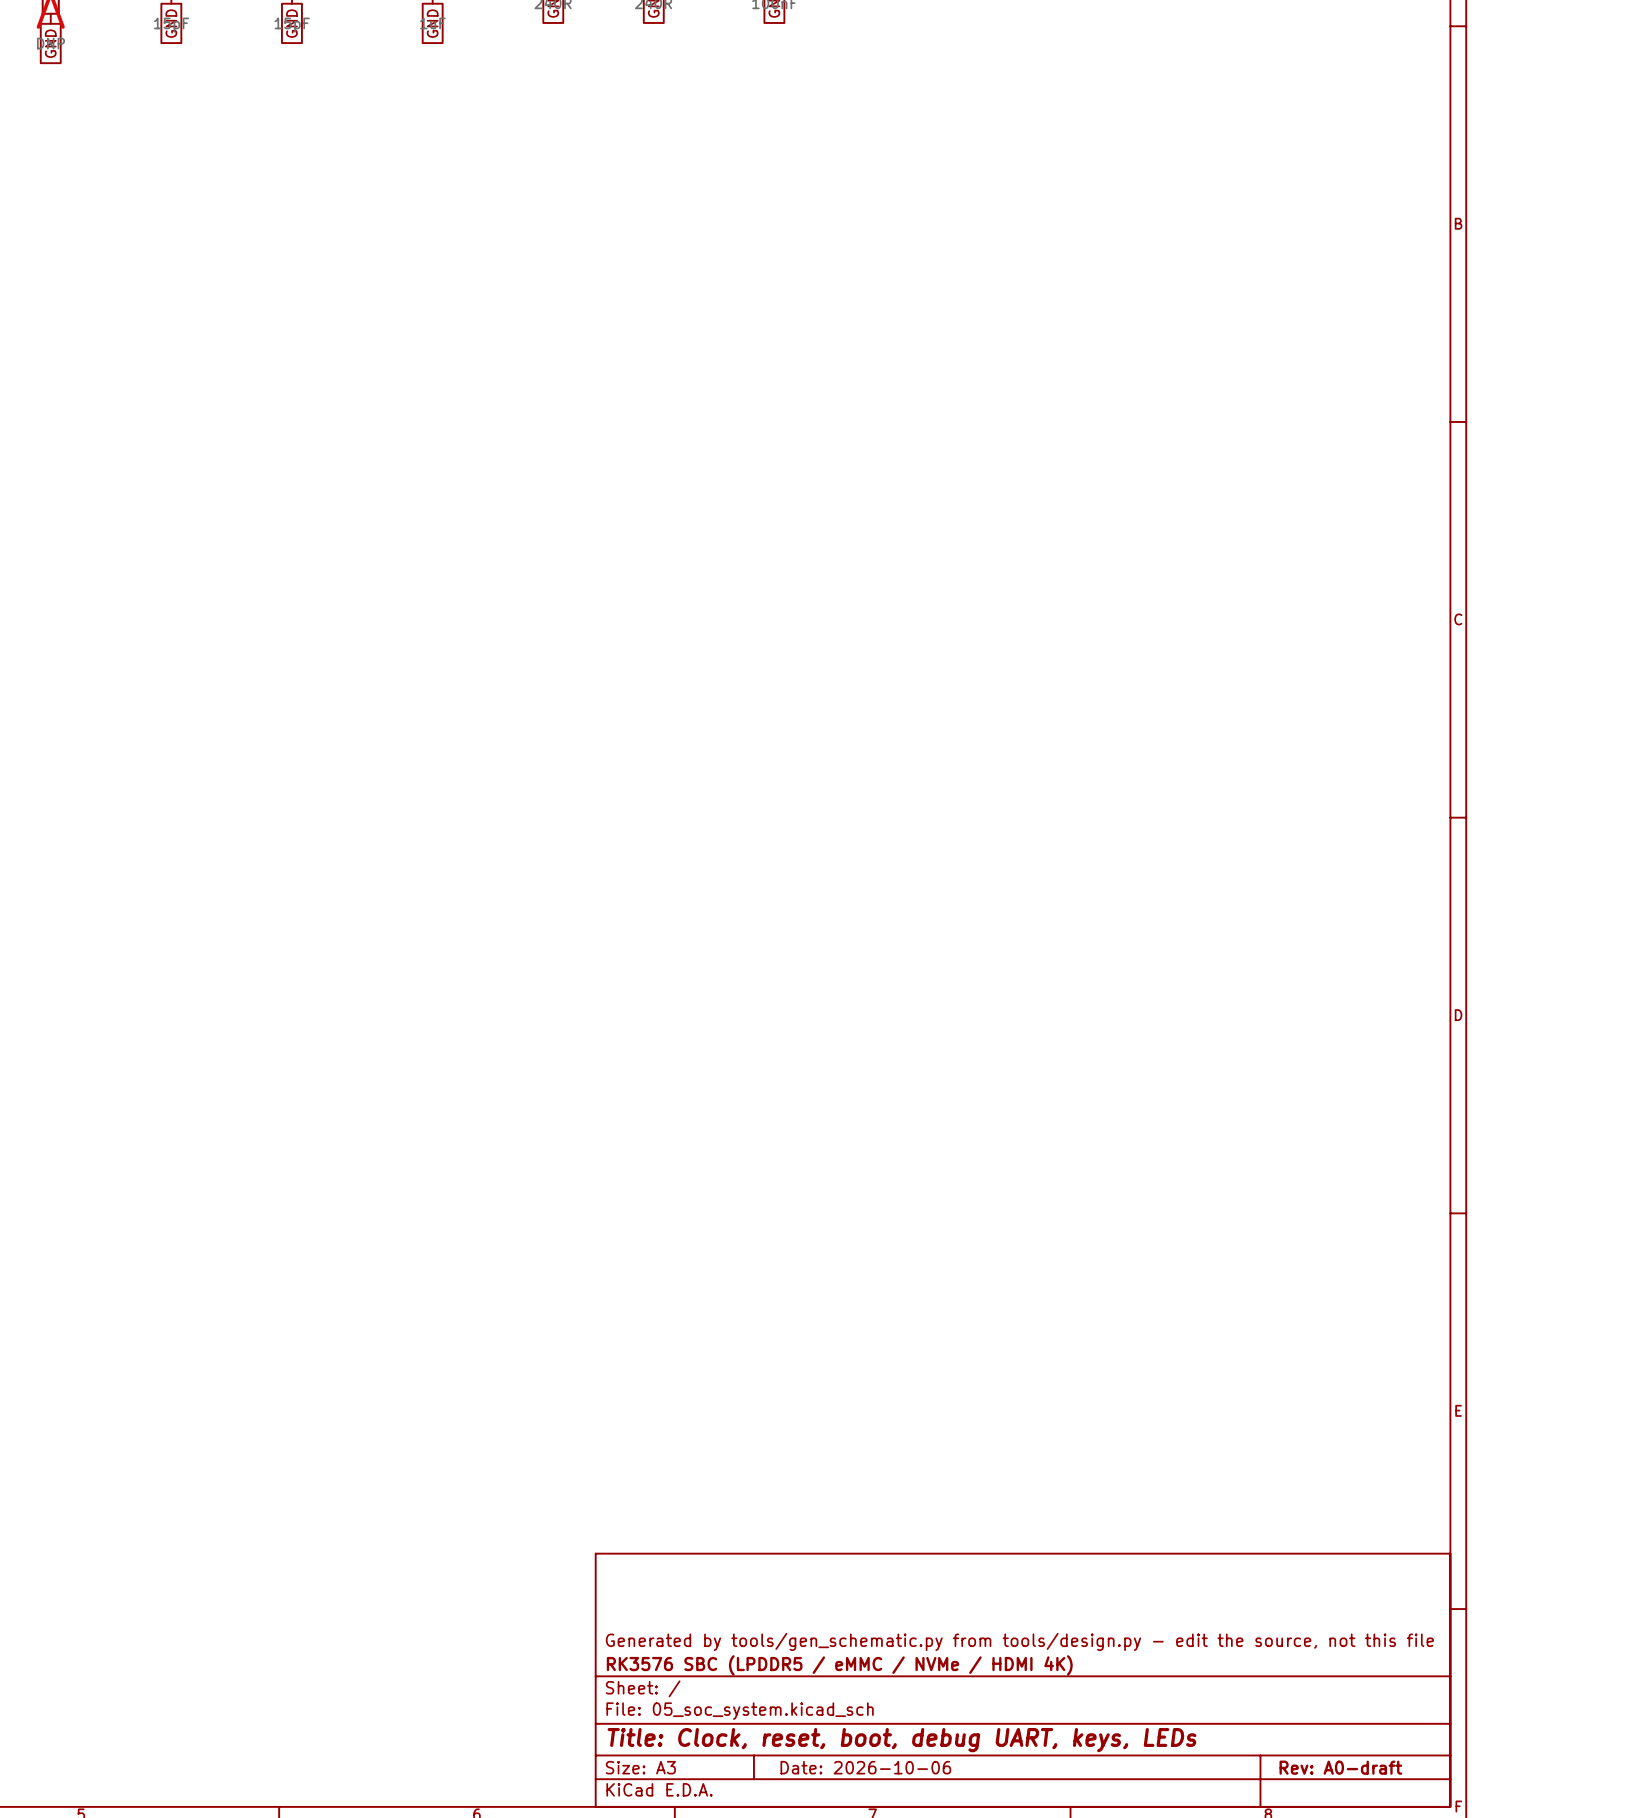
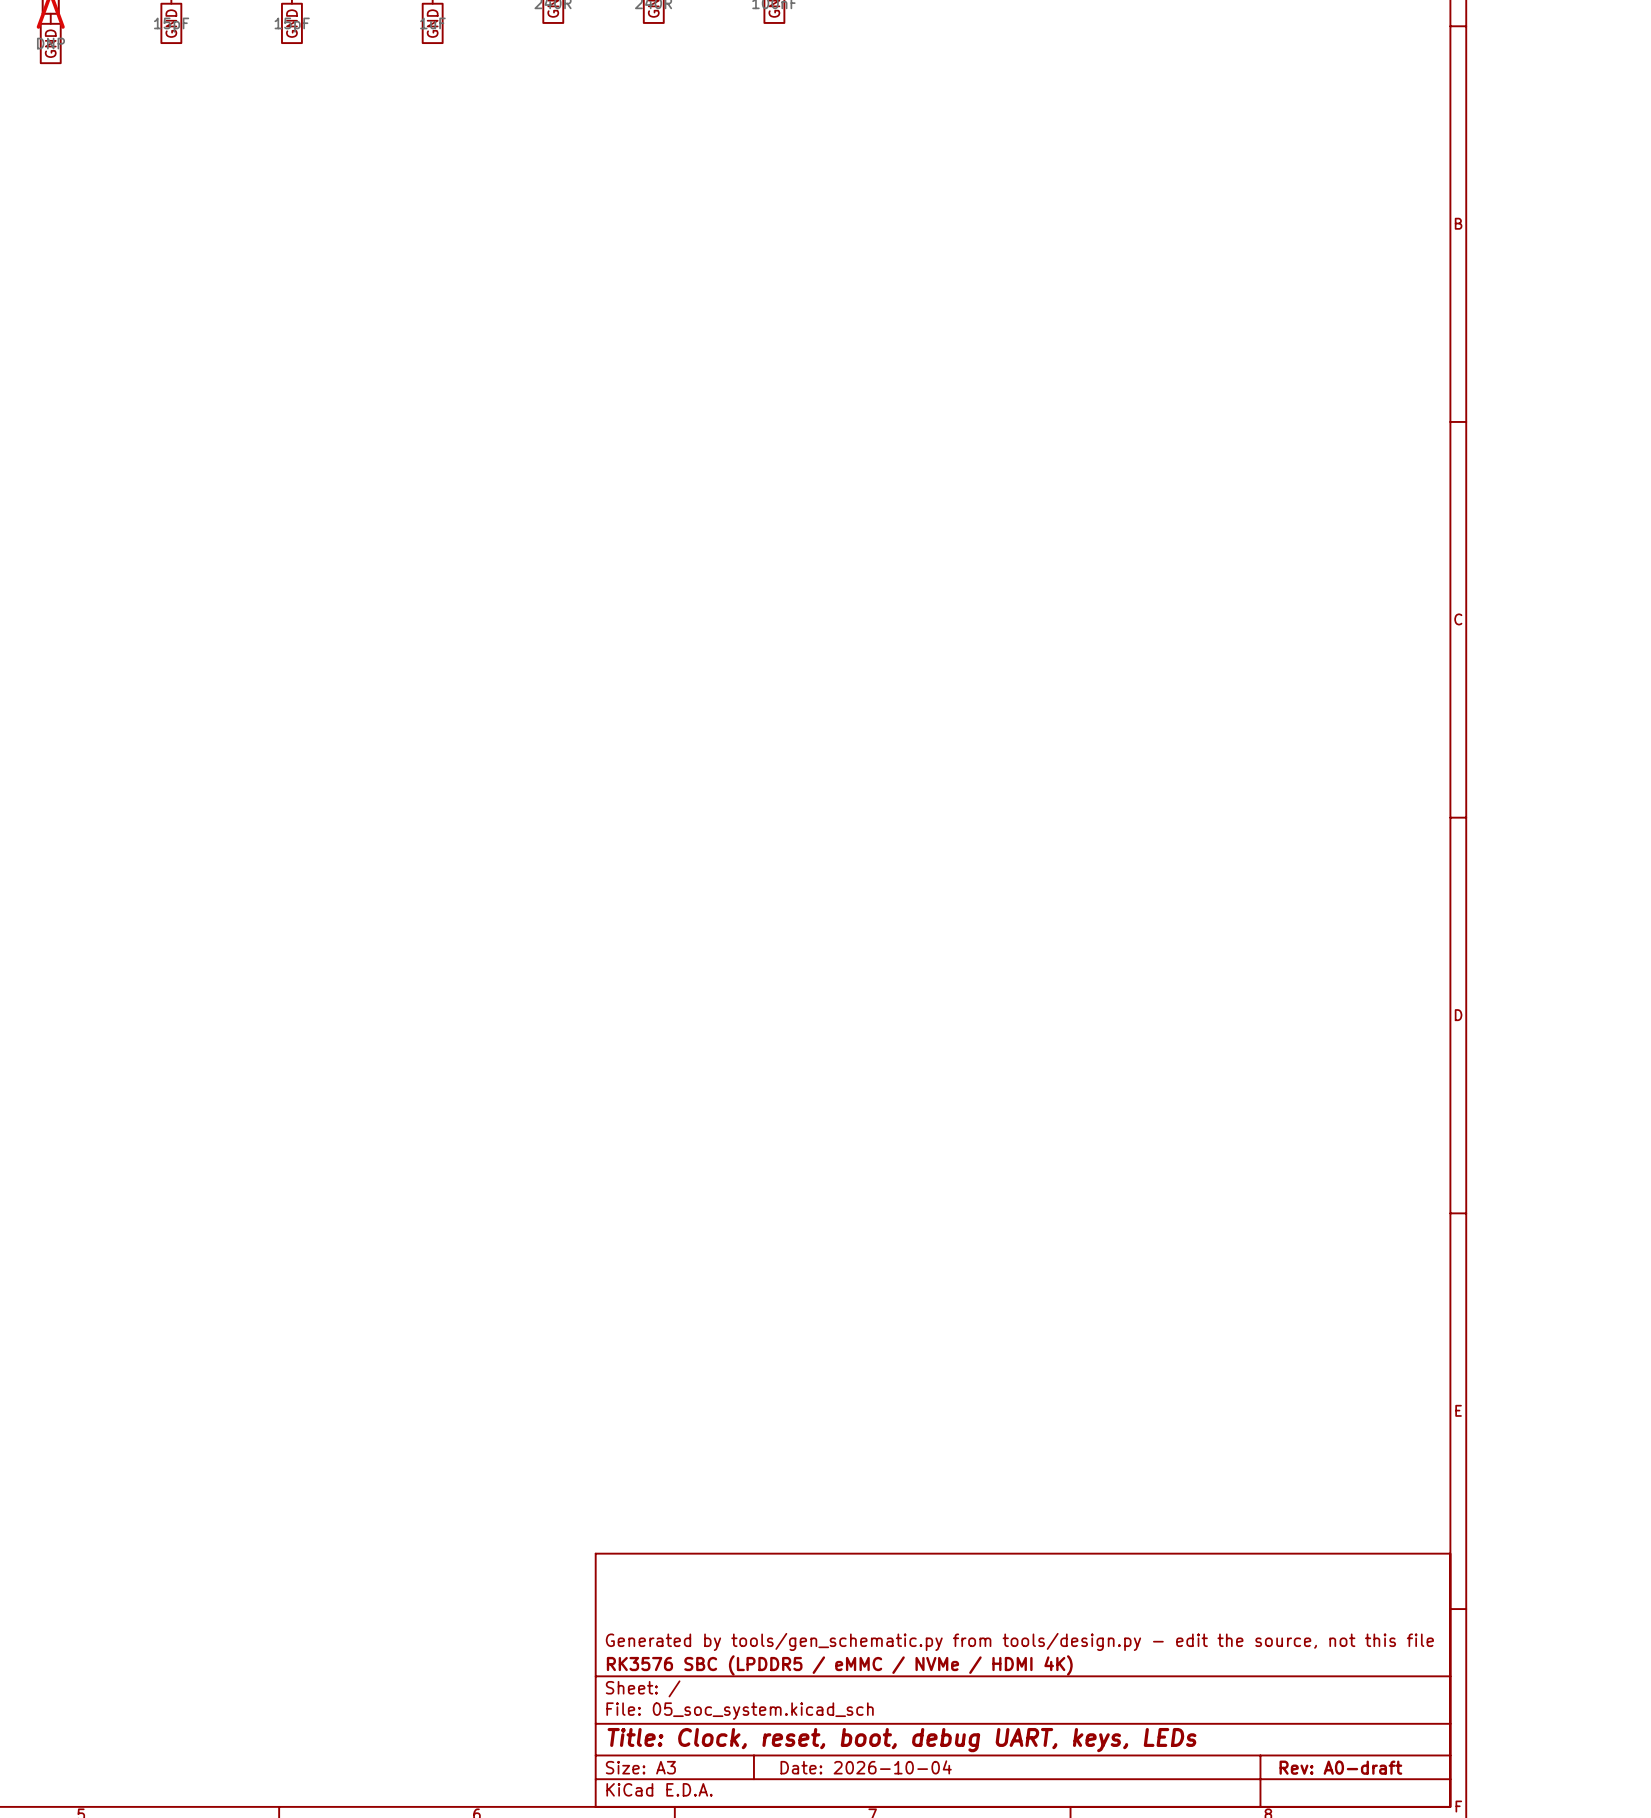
title block: Date: 2026-10-06 (865, 1767) -> Date: 2026-10-04 (866, 1767)

